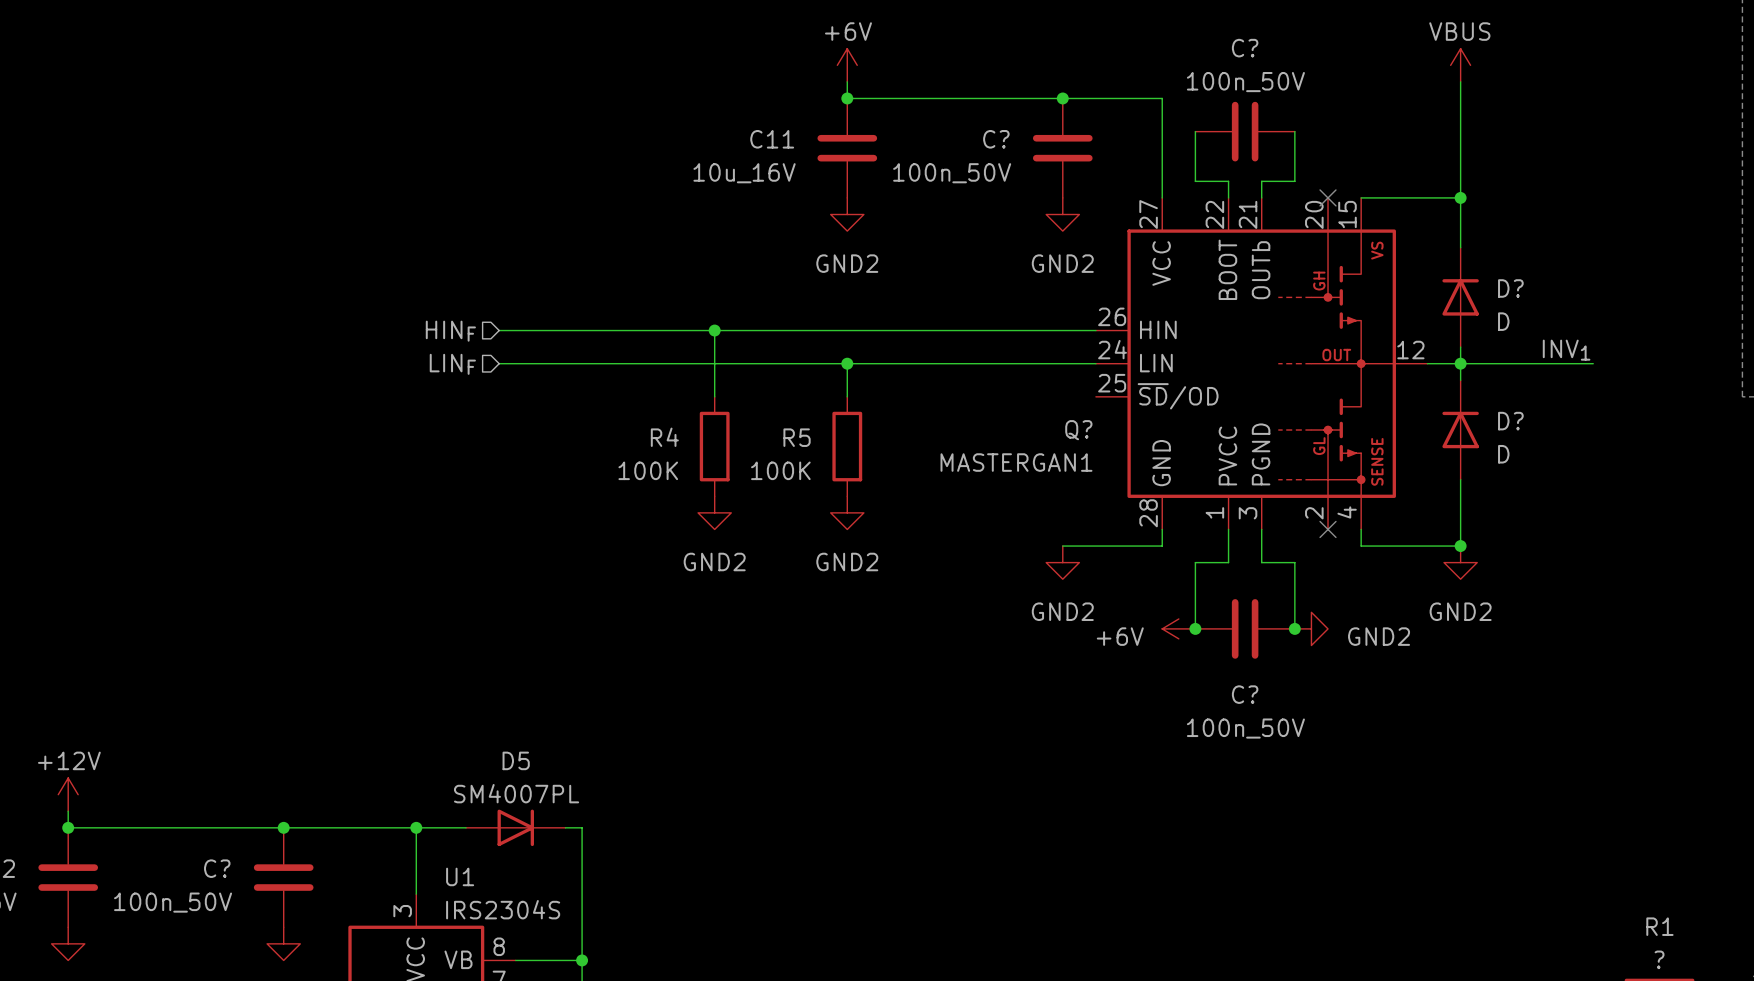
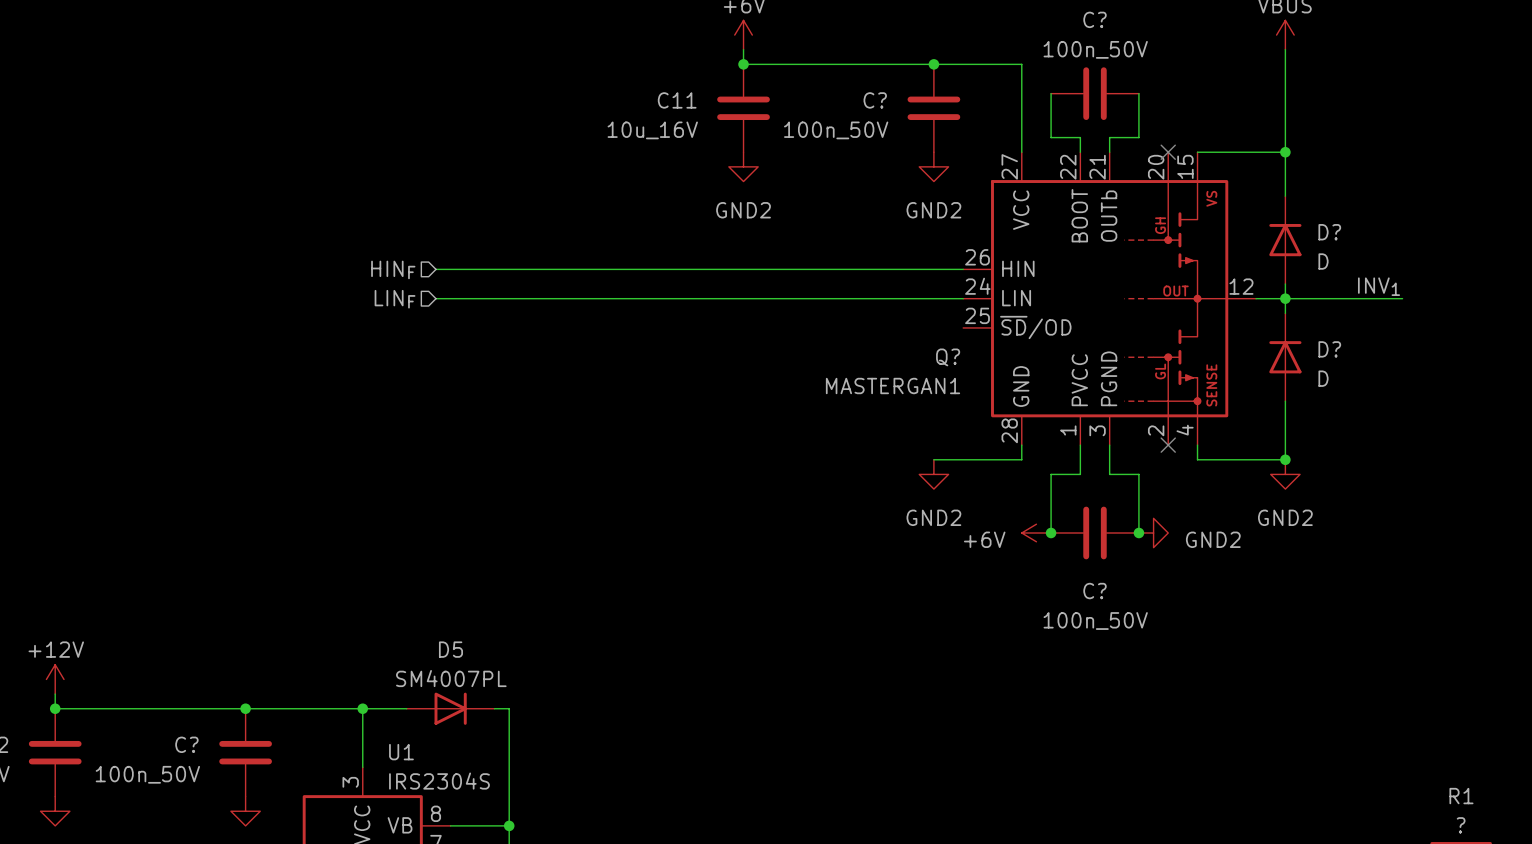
wire: (714, 330) (714, 396) -> none
junction: (714, 330) -> none
wire: (847, 363) (847, 396) -> none
junction: (847, 363) -> none
R4: 100K (714, 446) -> none
R5: 100K (847, 446) -> none
power symbol: GND2 (714, 512) -> none
power symbol: GND2 (847, 512) -> none

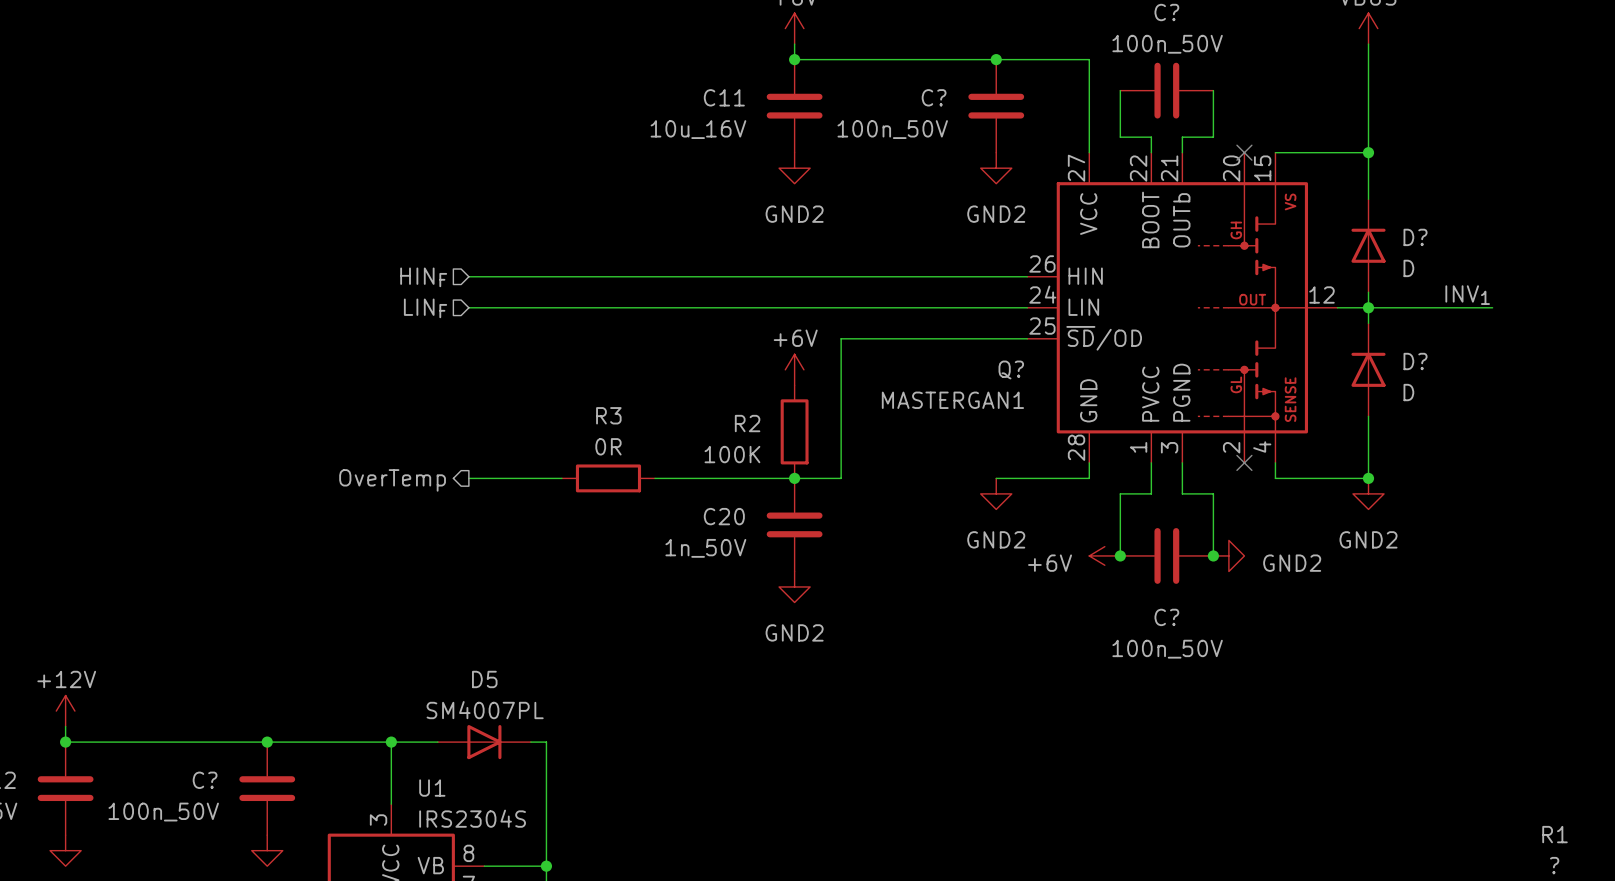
wire: none -> (1027, 338) (841, 338) (841, 478) (655, 478)
power symbol: none -> +6V (794, 369)
R2: none -> 100K (794, 431)
wire: none -> (468, 478) (561, 478)
R3: none -> 0R (608, 478)
junction: none -> (794, 478)
hierarchical label: none -> OverTemp (392, 480)
C20: none -> 1n_50V (794, 524)
power symbol: none -> GND2 (794, 586)

